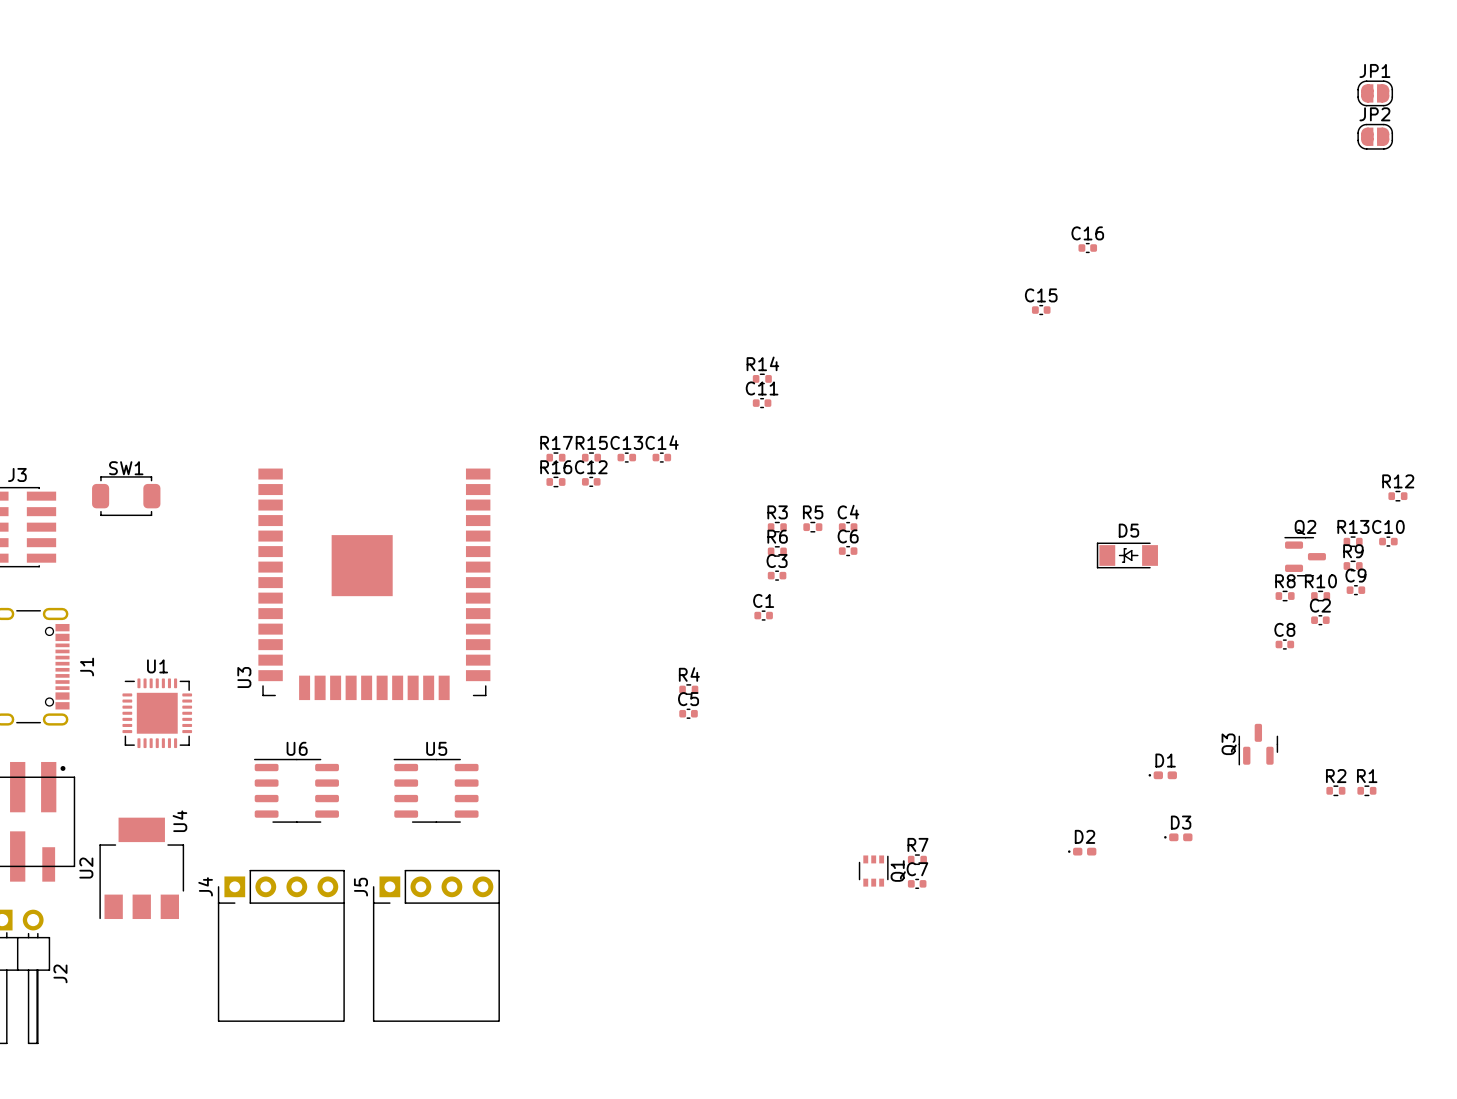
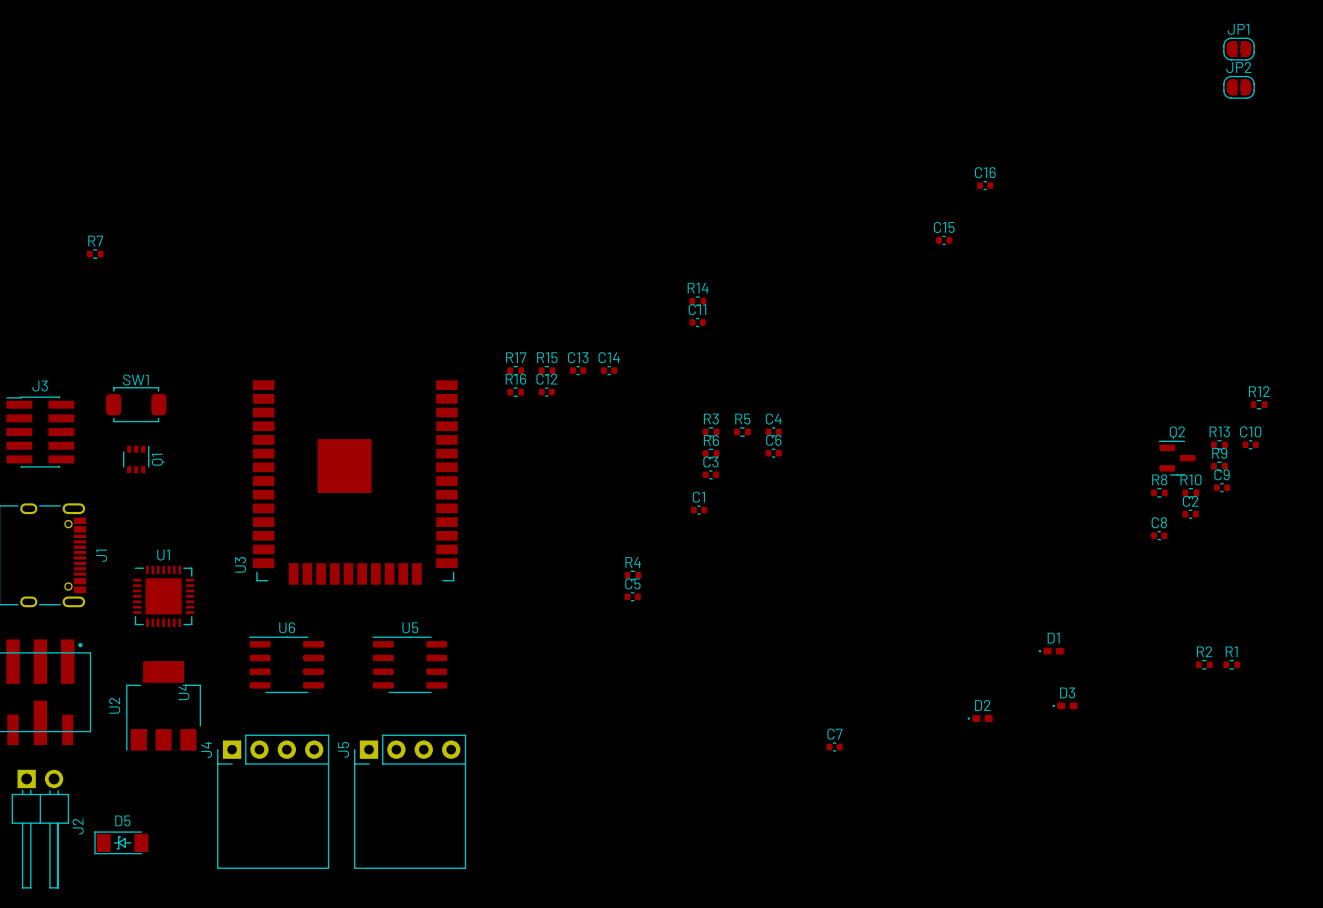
D5 position: (1127, 555) -> (121, 842)
Q3: (1258, 744) -> none
R7 position: (917, 859) -> (95, 254)
U2 position: (141, 868) -> (163, 705)
Q1 position: (873, 871) -> (136, 459)

